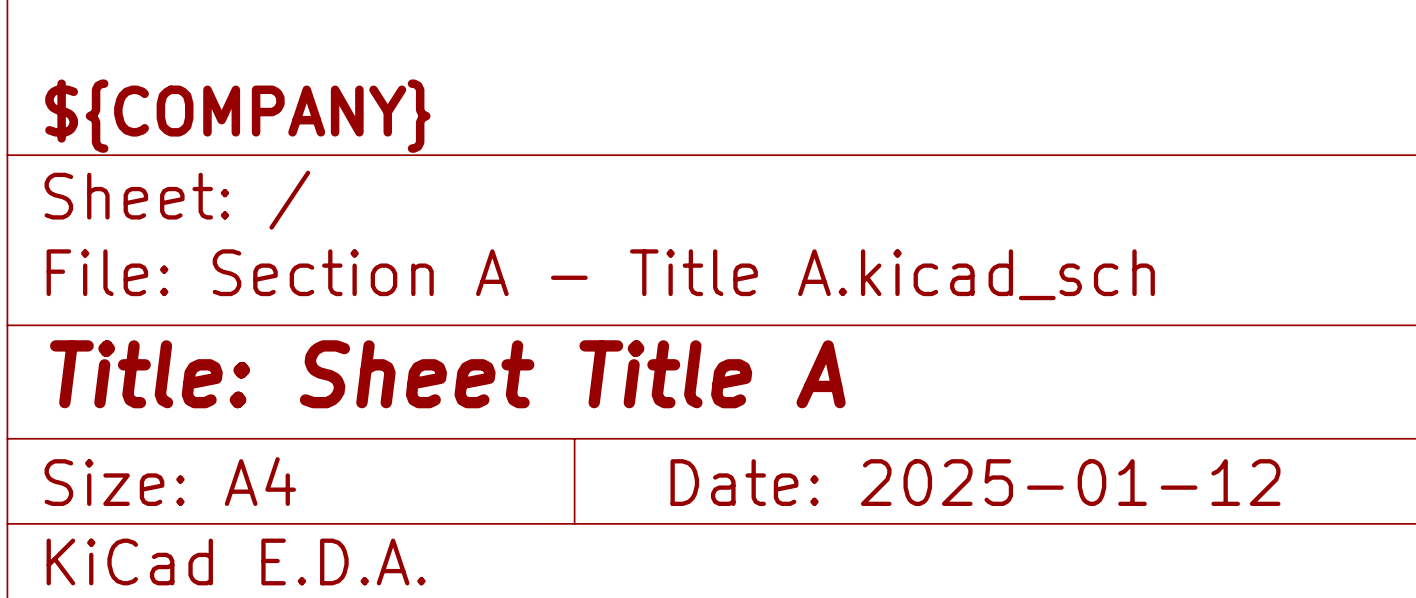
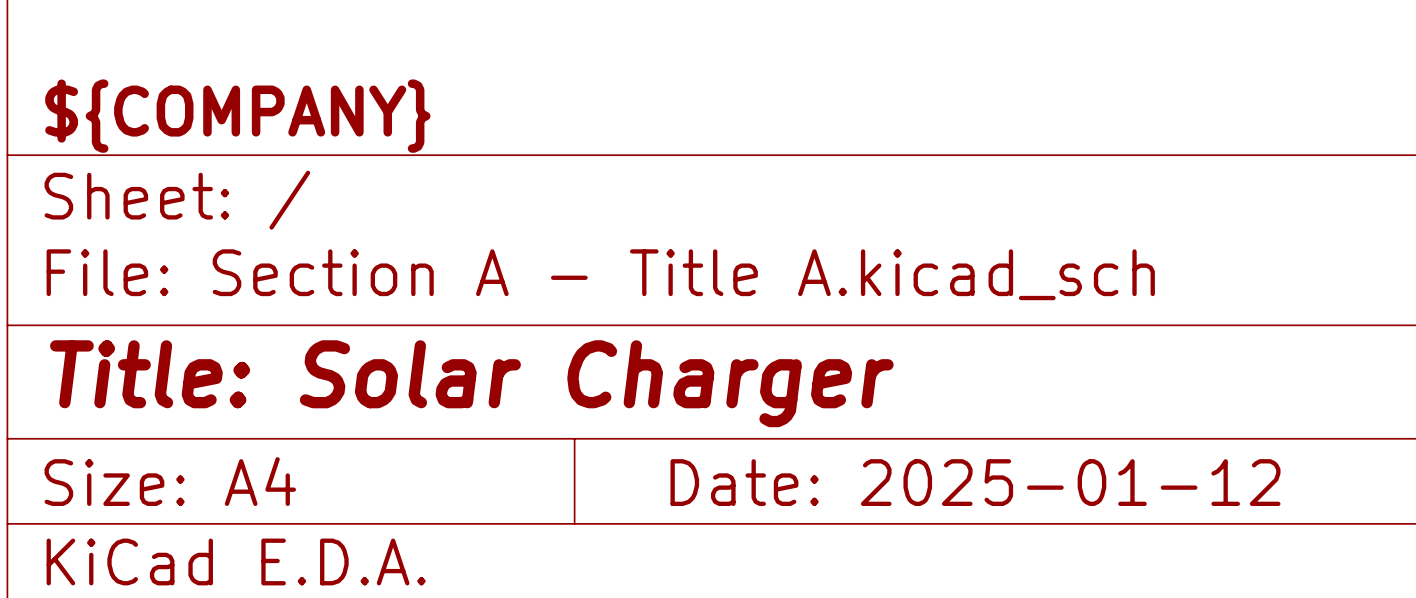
title block: Title: Sheet Title A (447, 374) -> Title: Solar Charger (471, 383)

